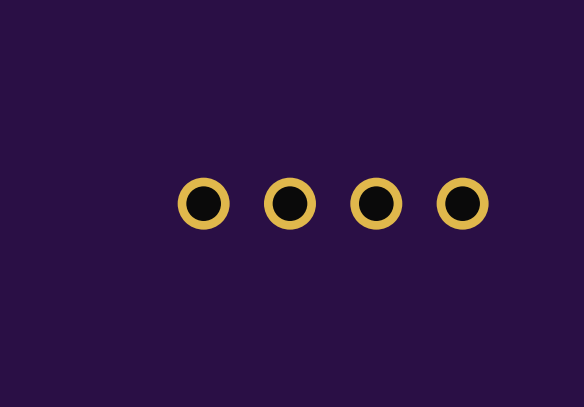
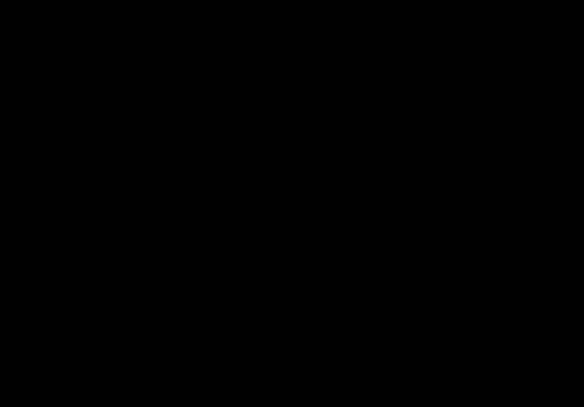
part: (333, 203) -> none

